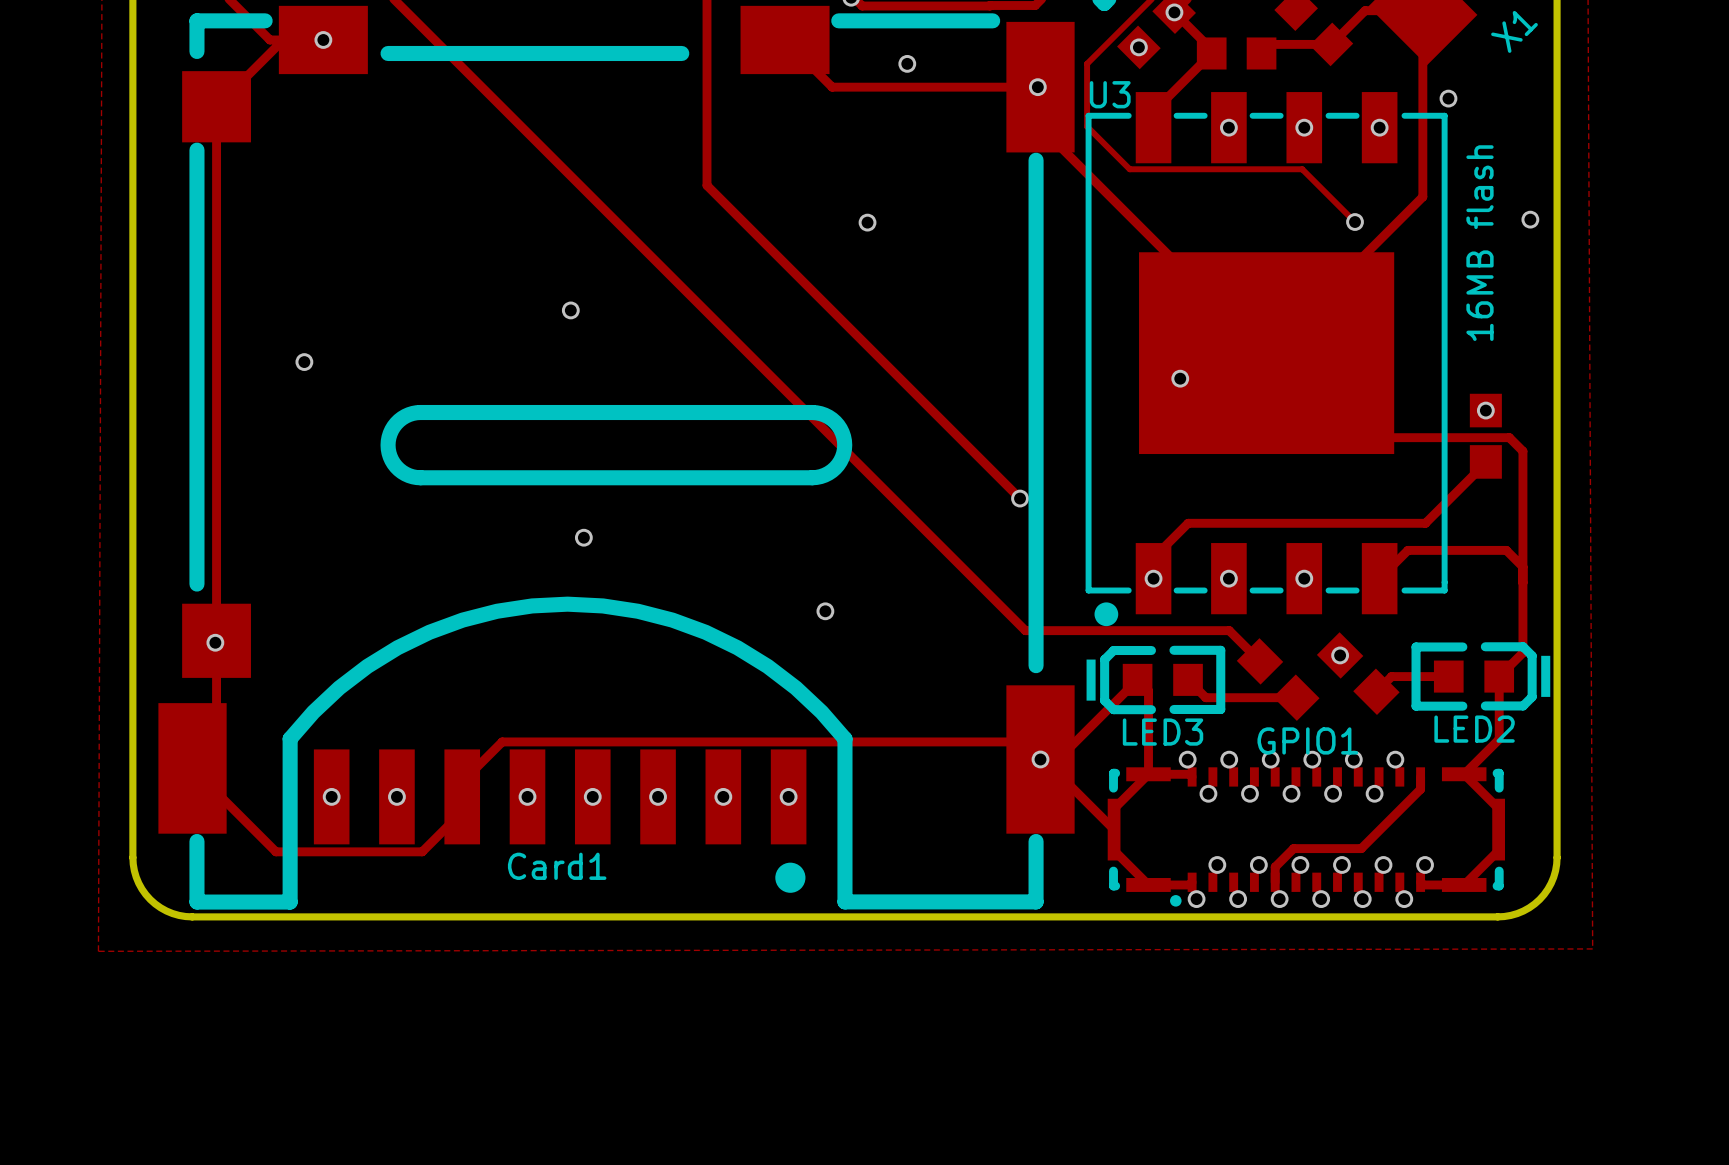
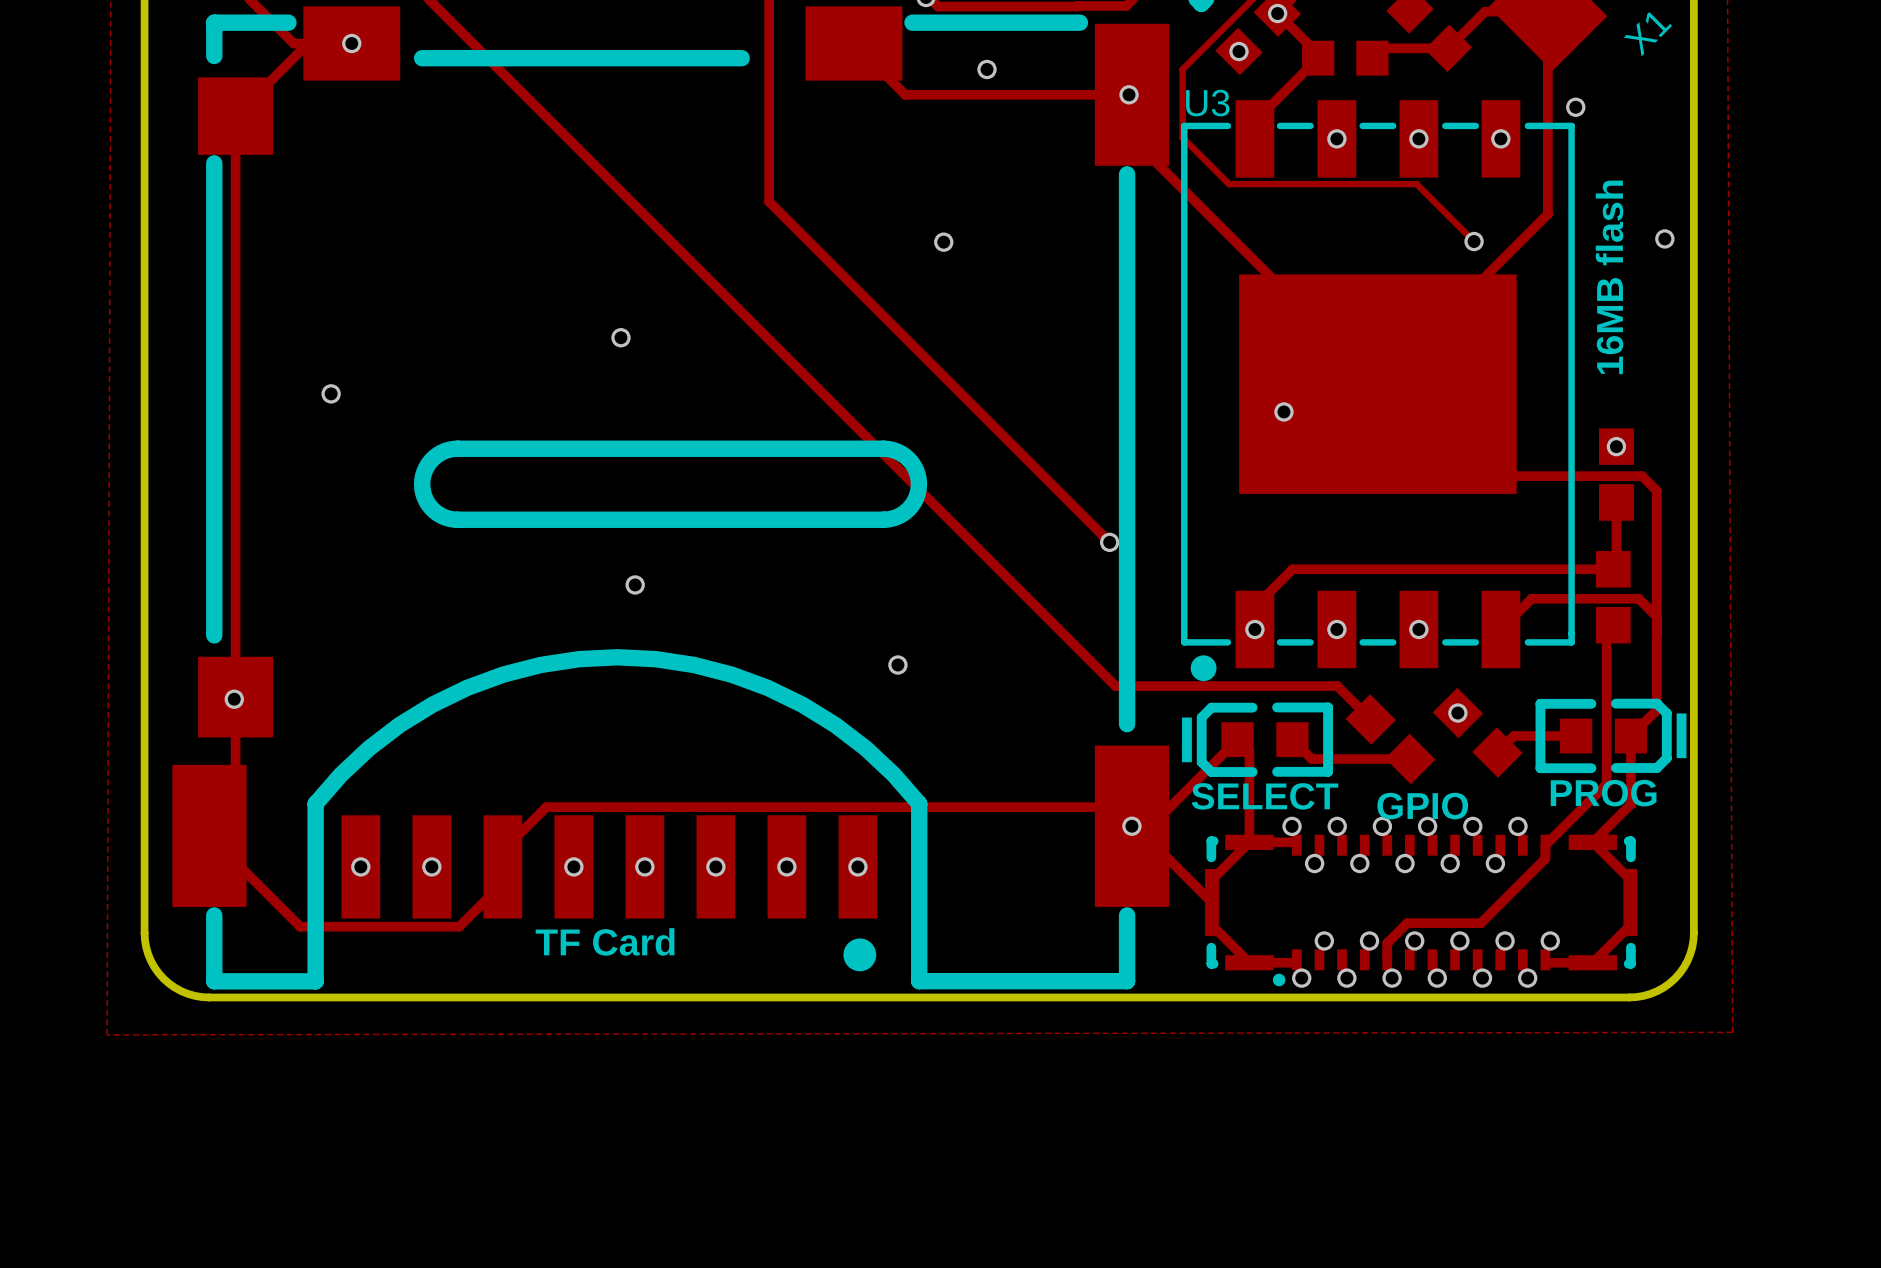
track: (1485, 462) (1425, 523) -> (1616, 503) (1616, 566) (1613, 569) (1550, 569)
part: none -> (1613, 597)
track: none -> (1613, 625) (1606, 631) (1606, 783) (1545, 845)
LED2 name: LED2 (1474, 729) -> PROG (1603, 793)
LED3 name: LED3 (1163, 732) -> SELECT (1264, 796)
GPIO1 name: GPIO1 (1307, 740) -> GPIO (1422, 806)
Card1 name: Card1 (557, 866) -> TF Card (605, 941)

